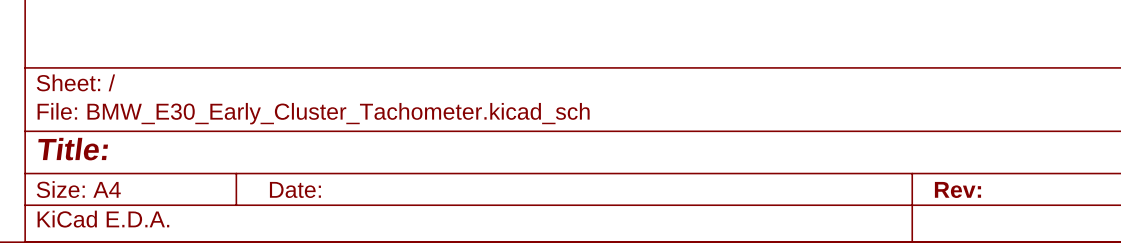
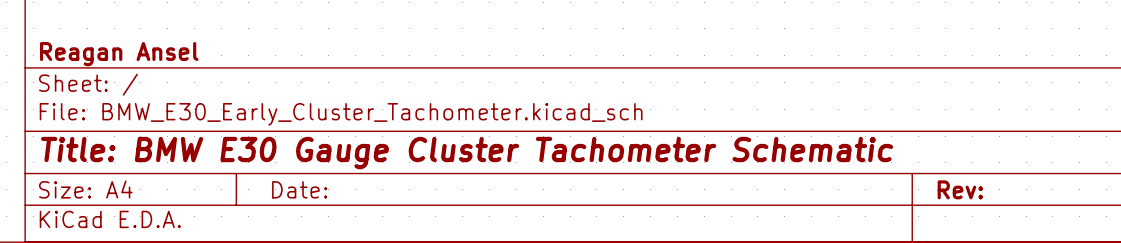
title block: none -> Reagan Ansel (119, 54)
title block: Title: (73, 149) -> Title: BMW E30 Gauge Cluster Tachometer Schematic (467, 153)

